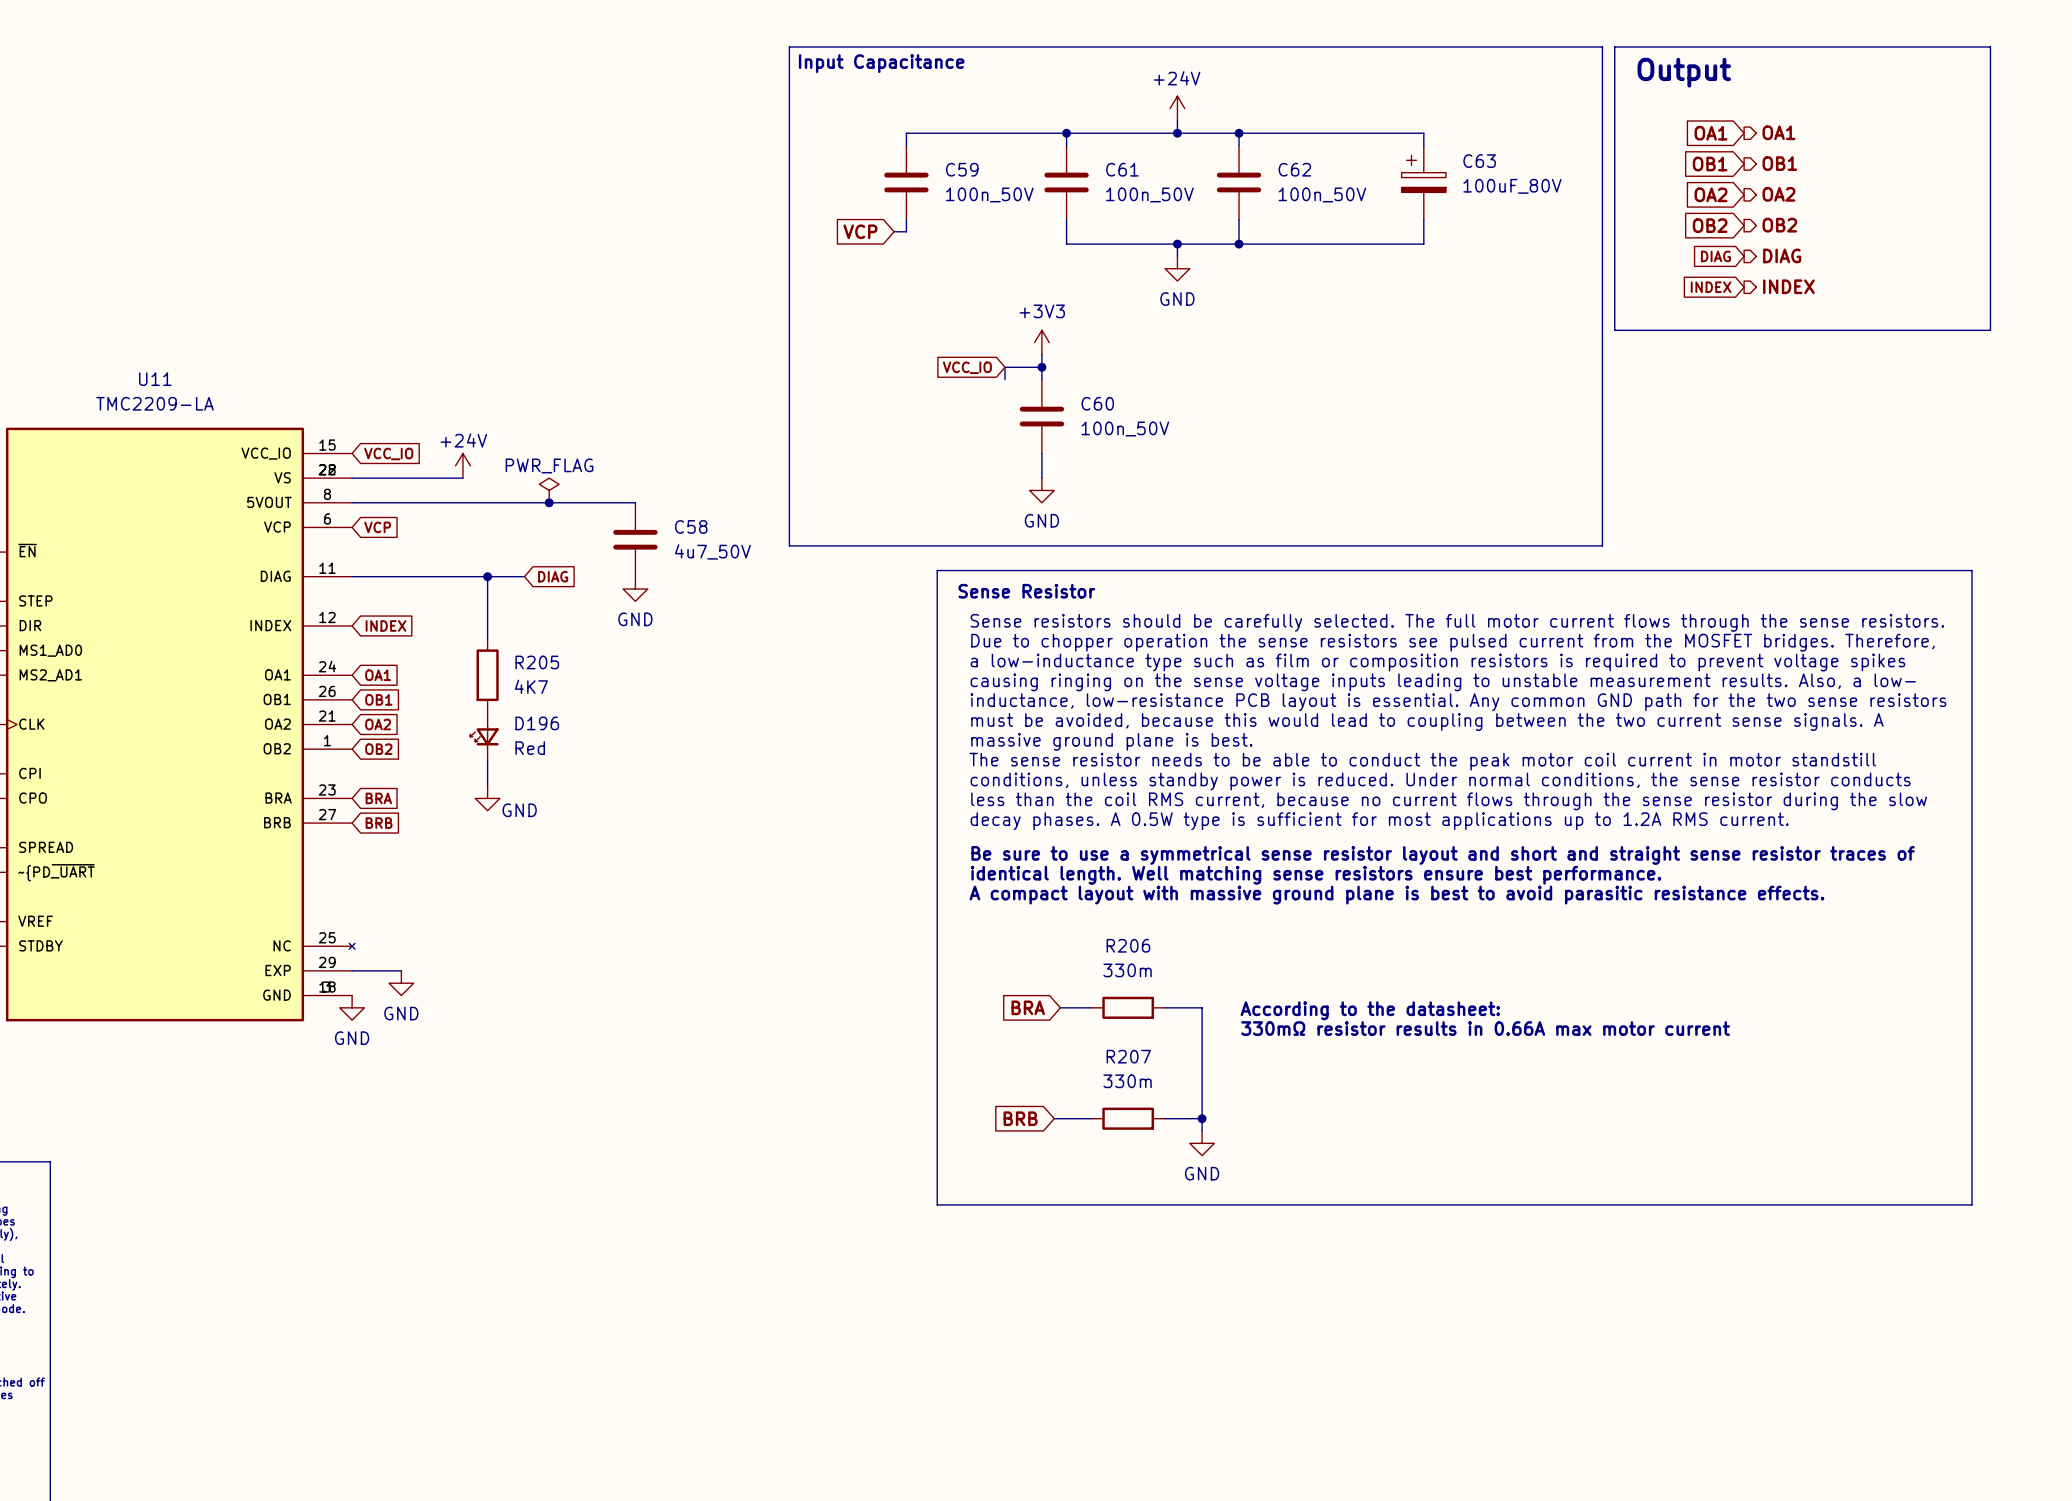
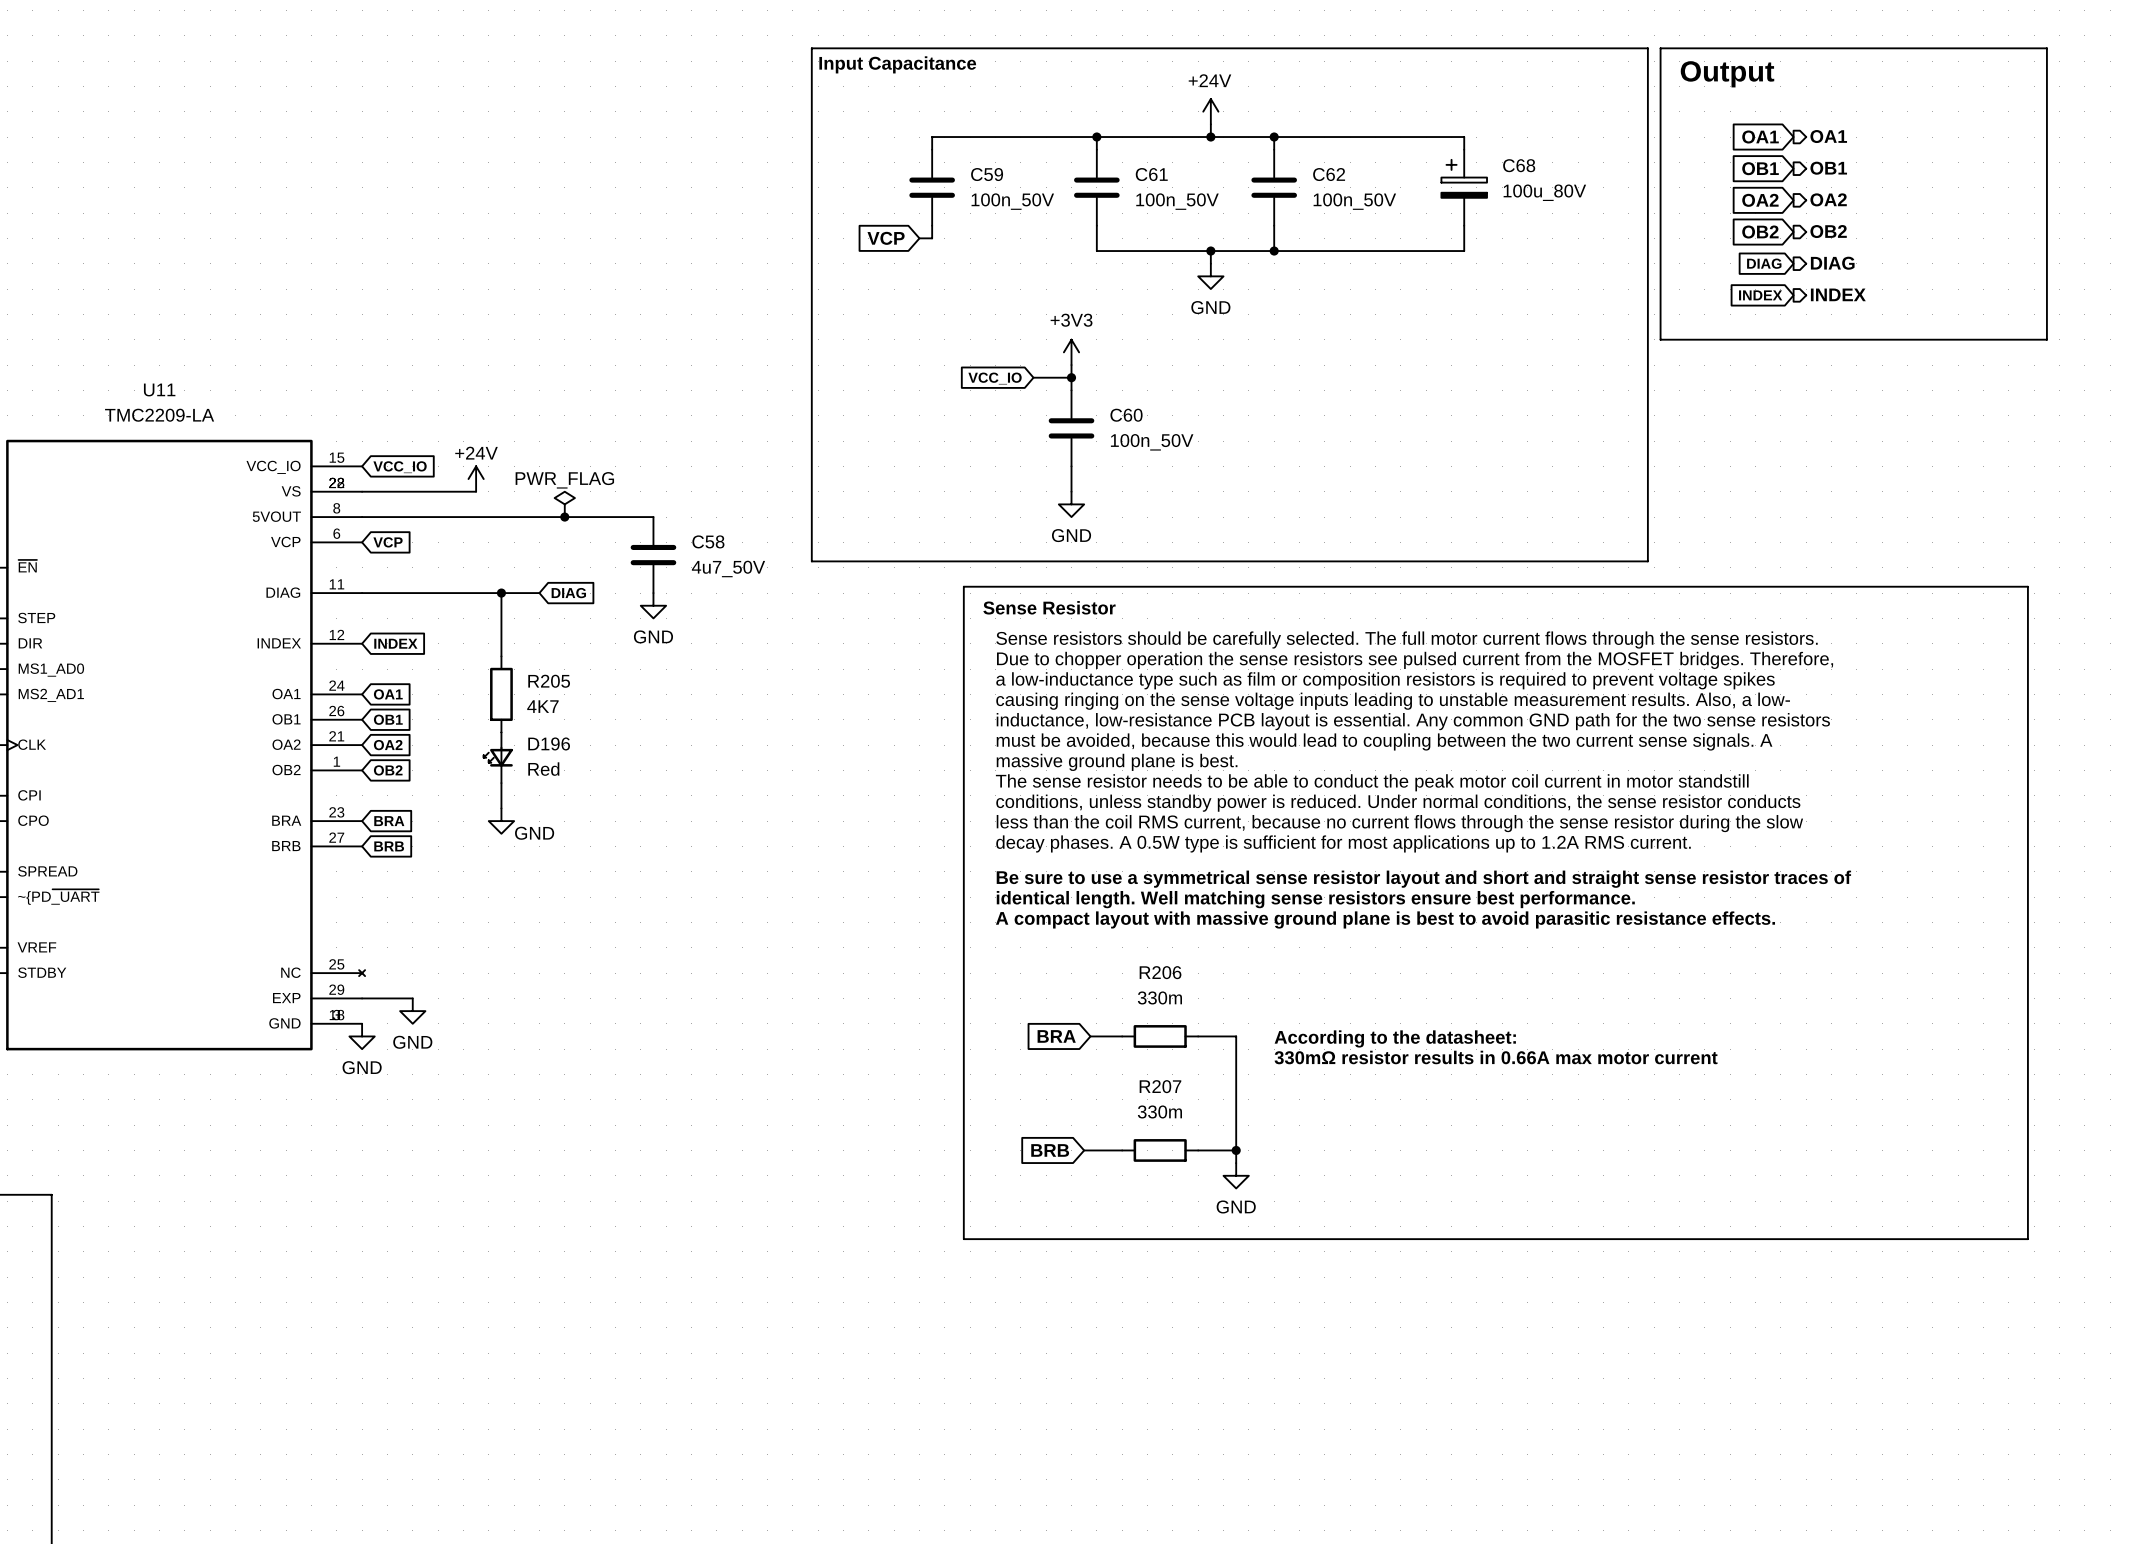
C63 name: C63 (1479, 161) -> C68 (1519, 165)
C63 value: 100uF_80V (1512, 186) -> 100u_80V (1544, 192)
wire: (1004, 367) (1004, 379) -> none

